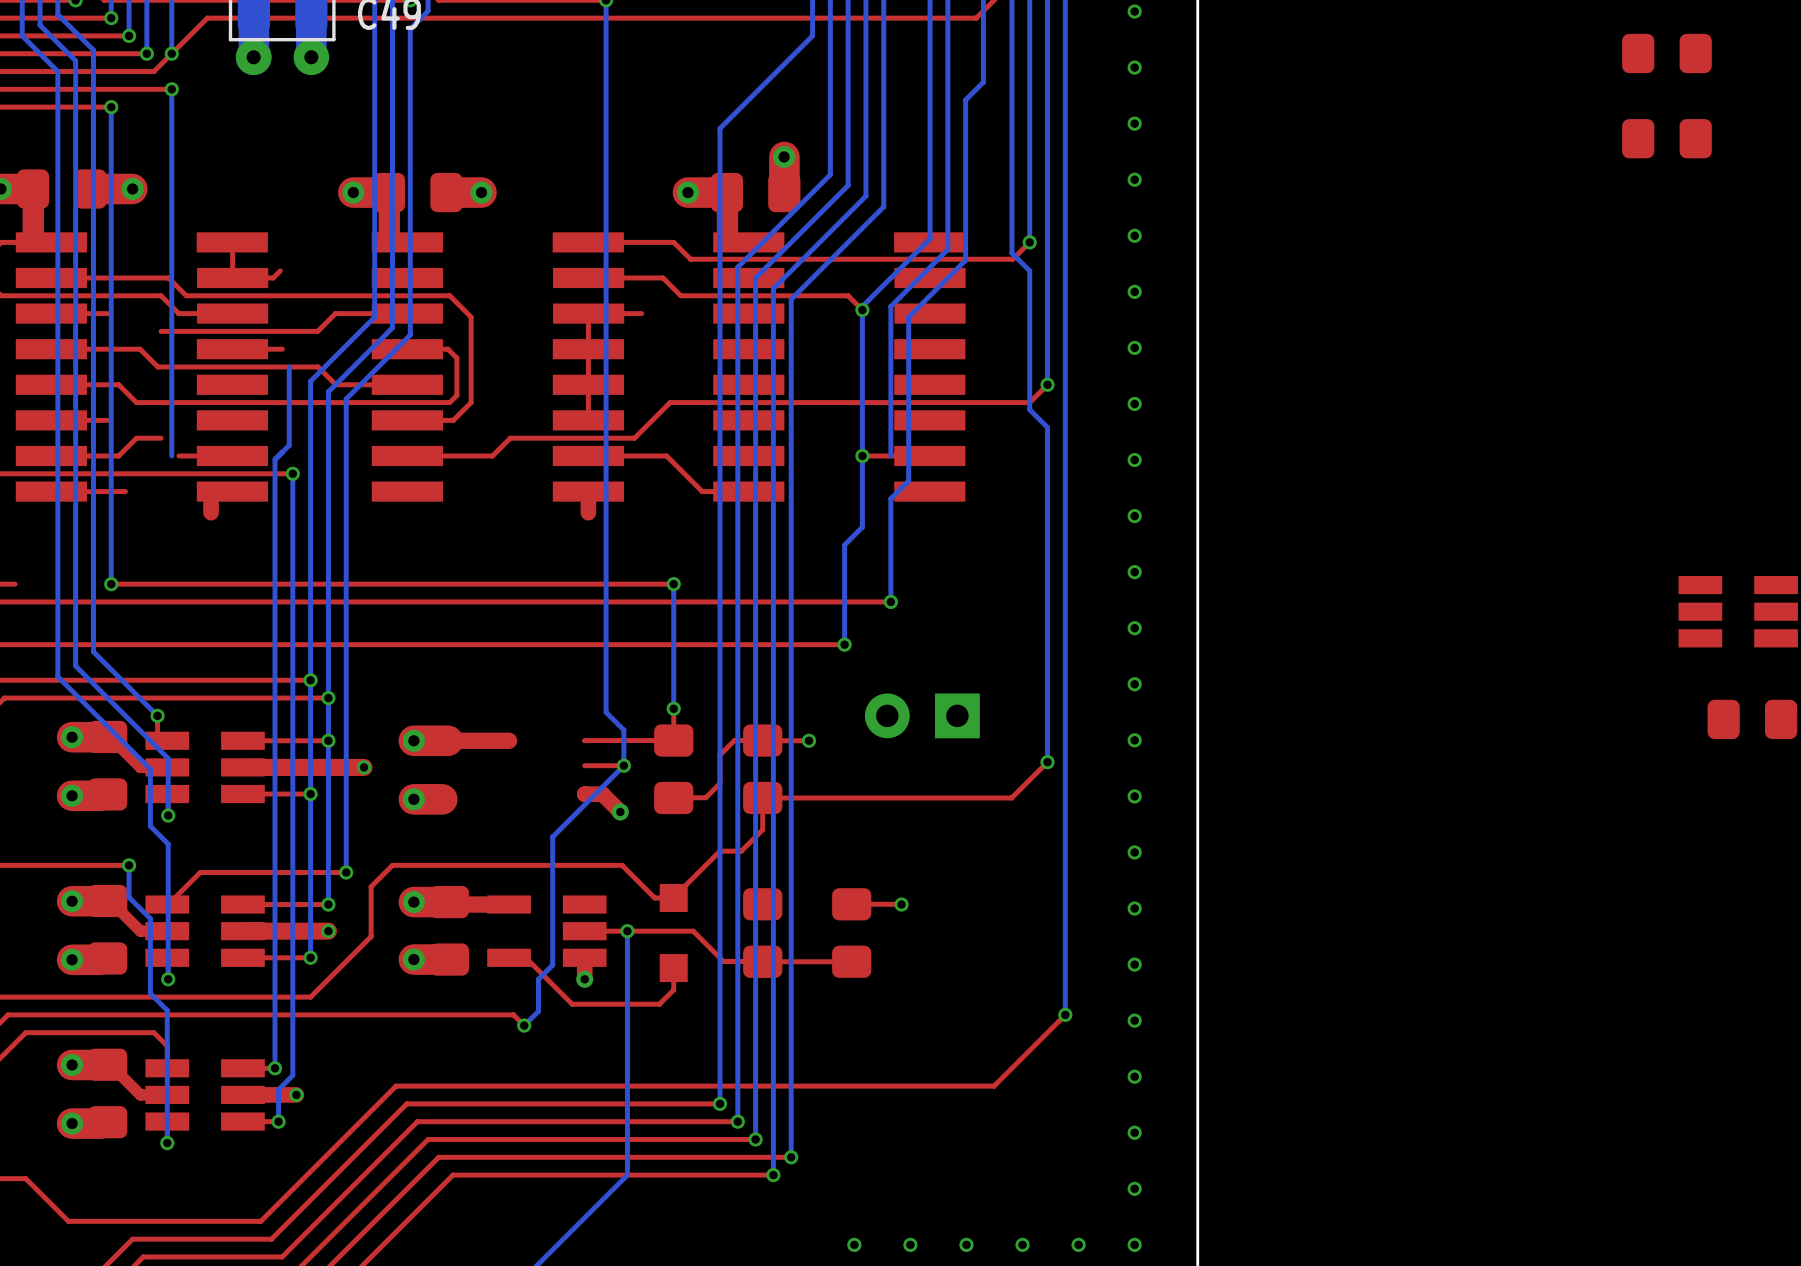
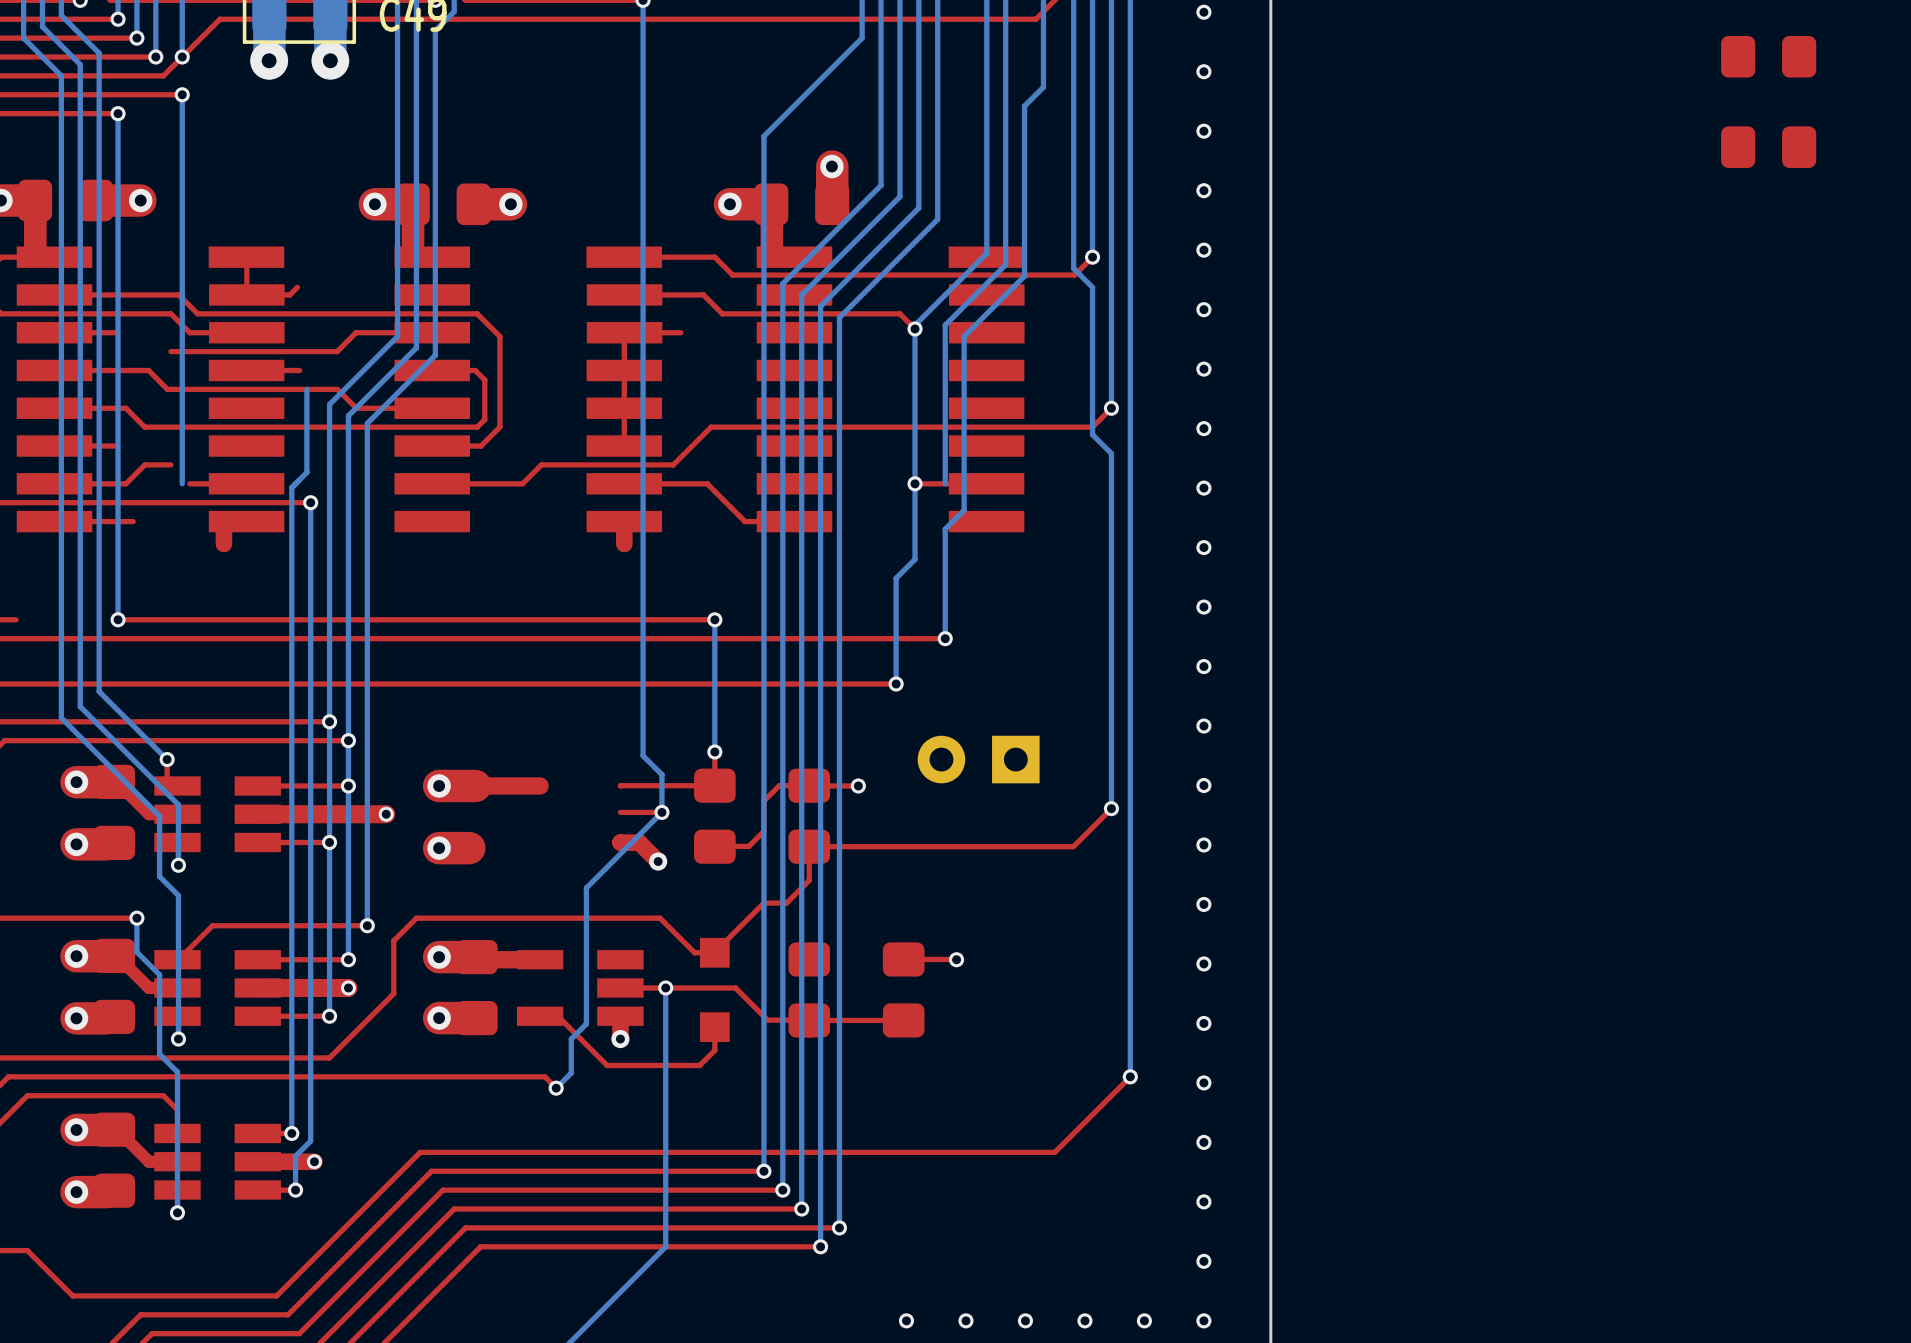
part: (1738, 611) -> none
part: (1752, 719) -> none

